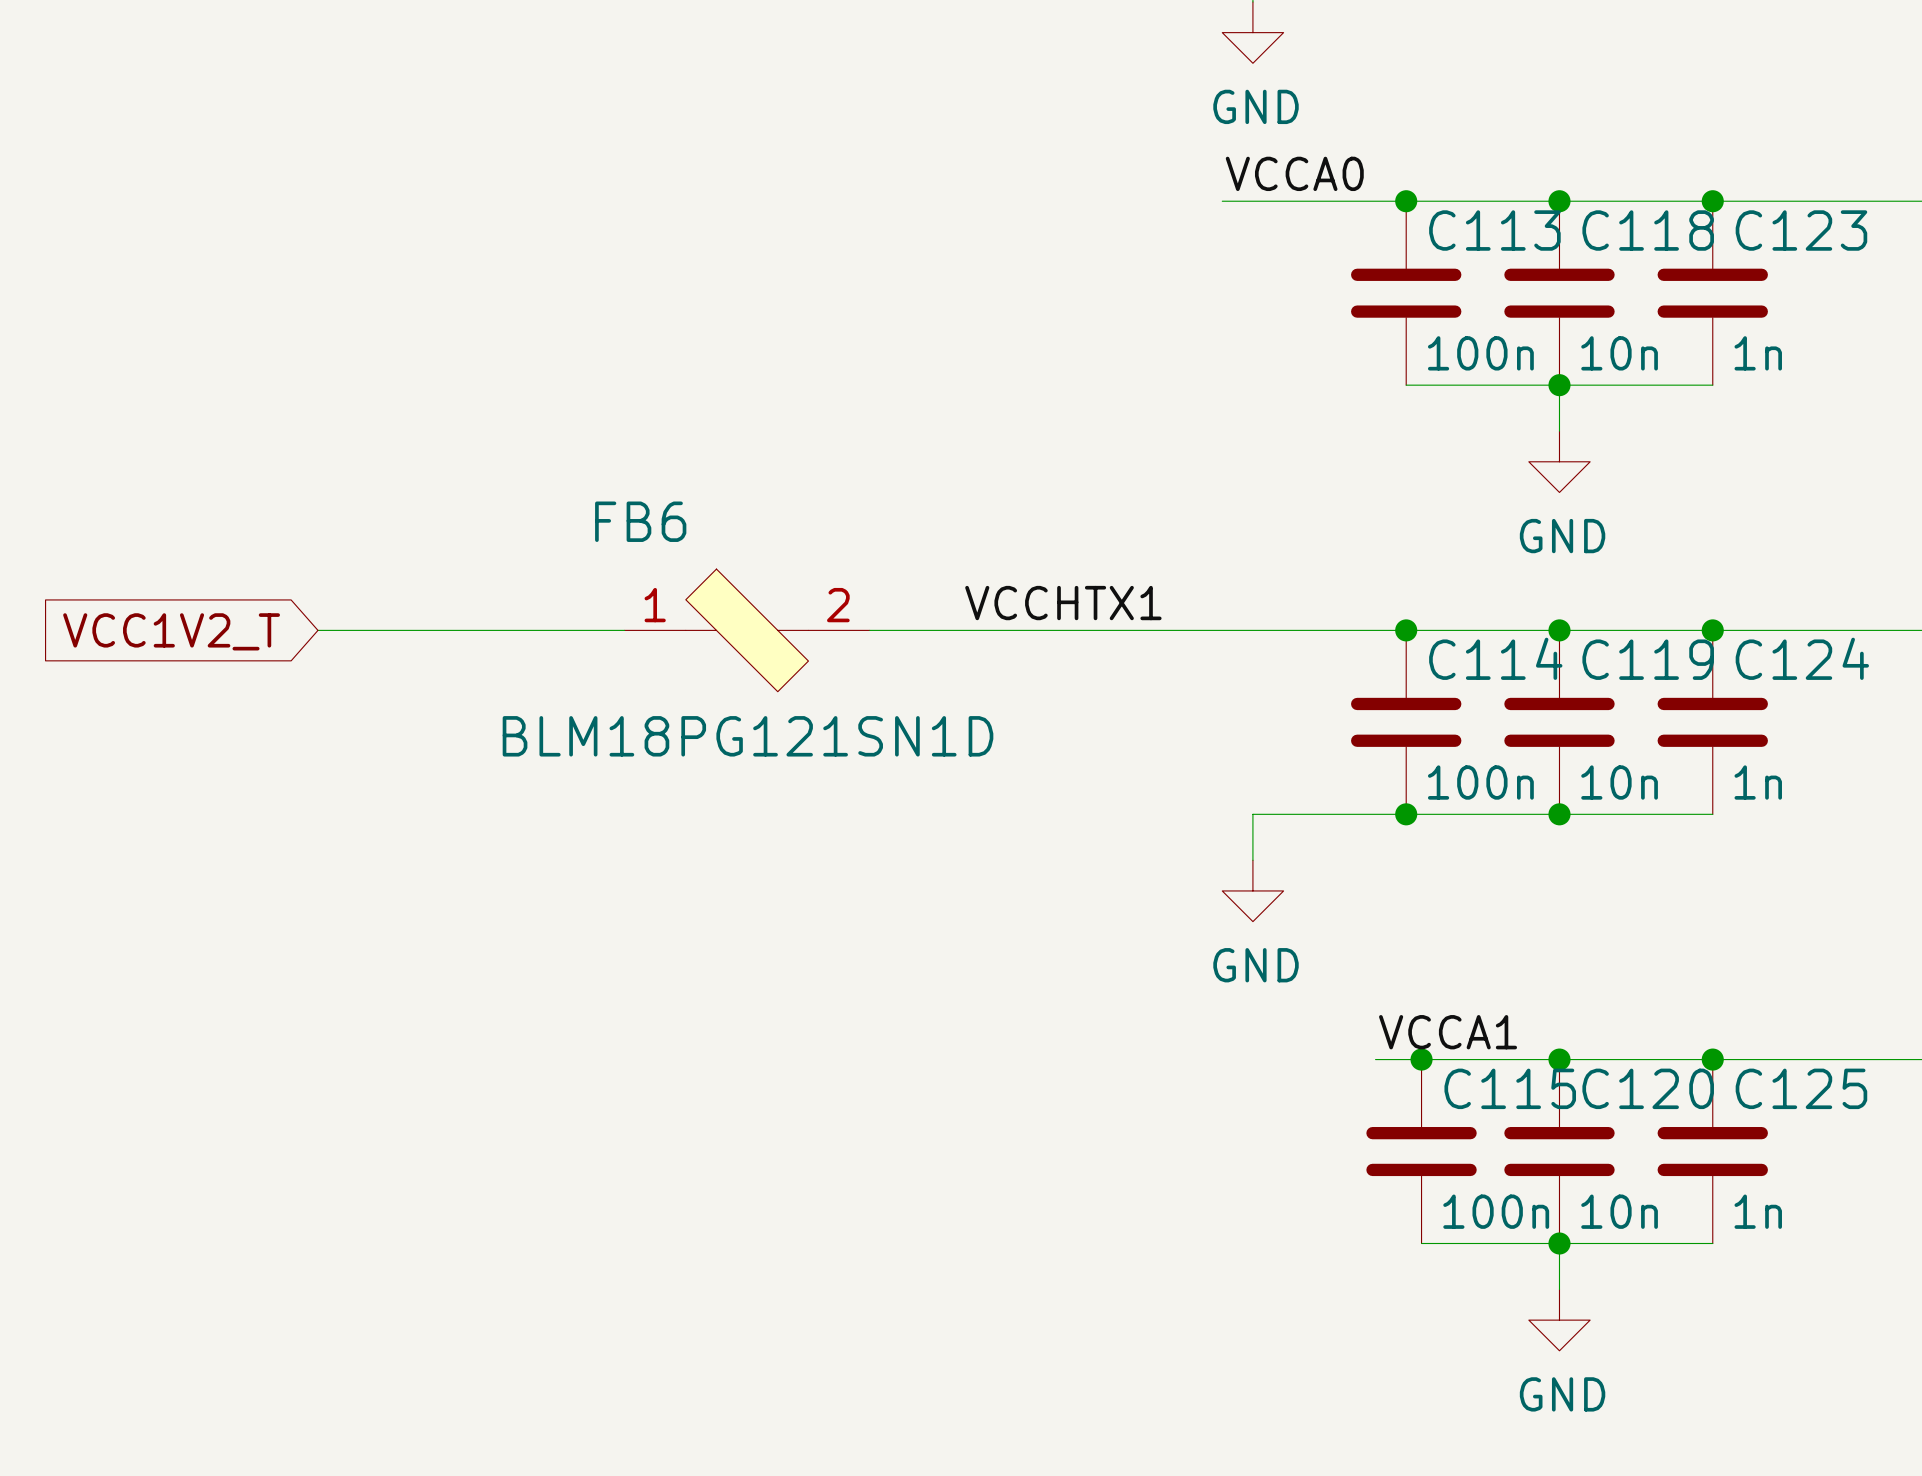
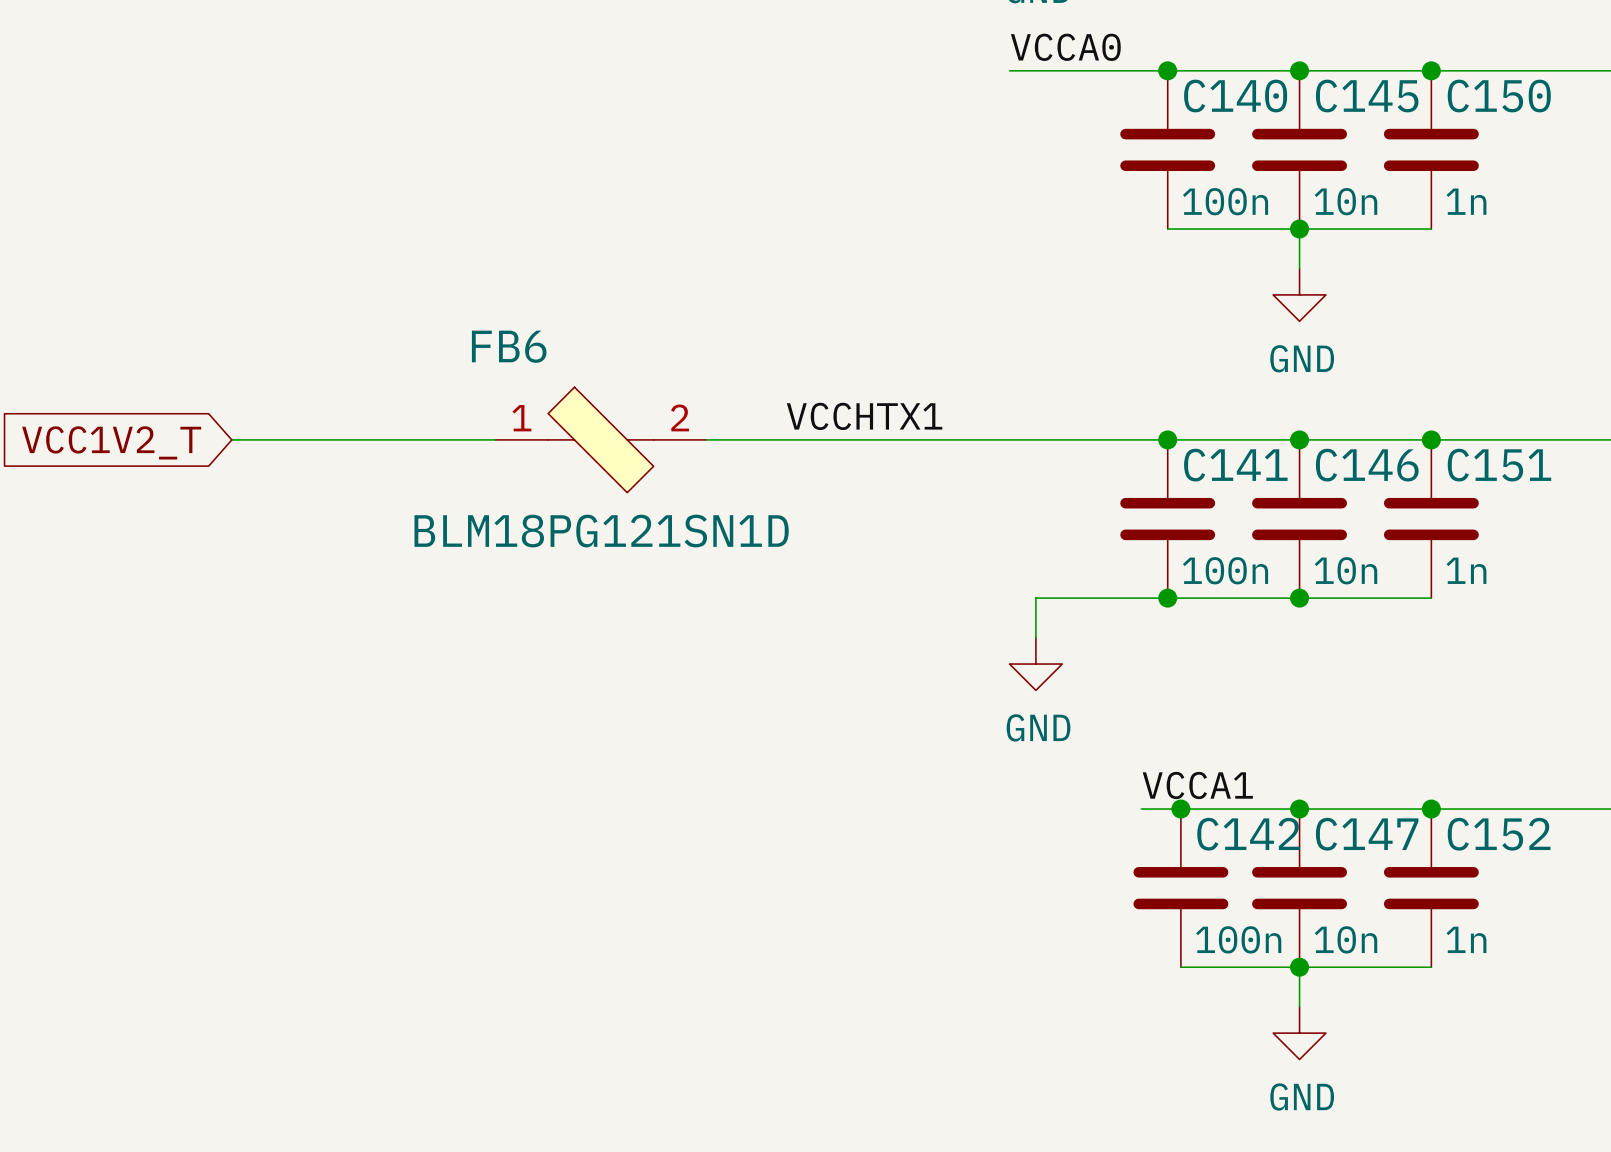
C113 name: C113 (1494, 230) -> C140 (1235, 96)
C118 name: C118 (1648, 230) -> C145 (1367, 96)
C123 name: C123 (1801, 230) -> C150 (1499, 96)
C114 name: C114 (1495, 658) -> C141 (1235, 465)
C124 name: C124 (1802, 658) -> C151 (1499, 465)
C119 name: C119 (1648, 659) -> C146 (1367, 465)
C115 name: C115 (1510, 1088) -> C142 (1248, 834)
C120 name: C120 (1648, 1088) -> C147 (1367, 834)
C125 name: C125 (1801, 1088) -> C152 (1499, 834)

